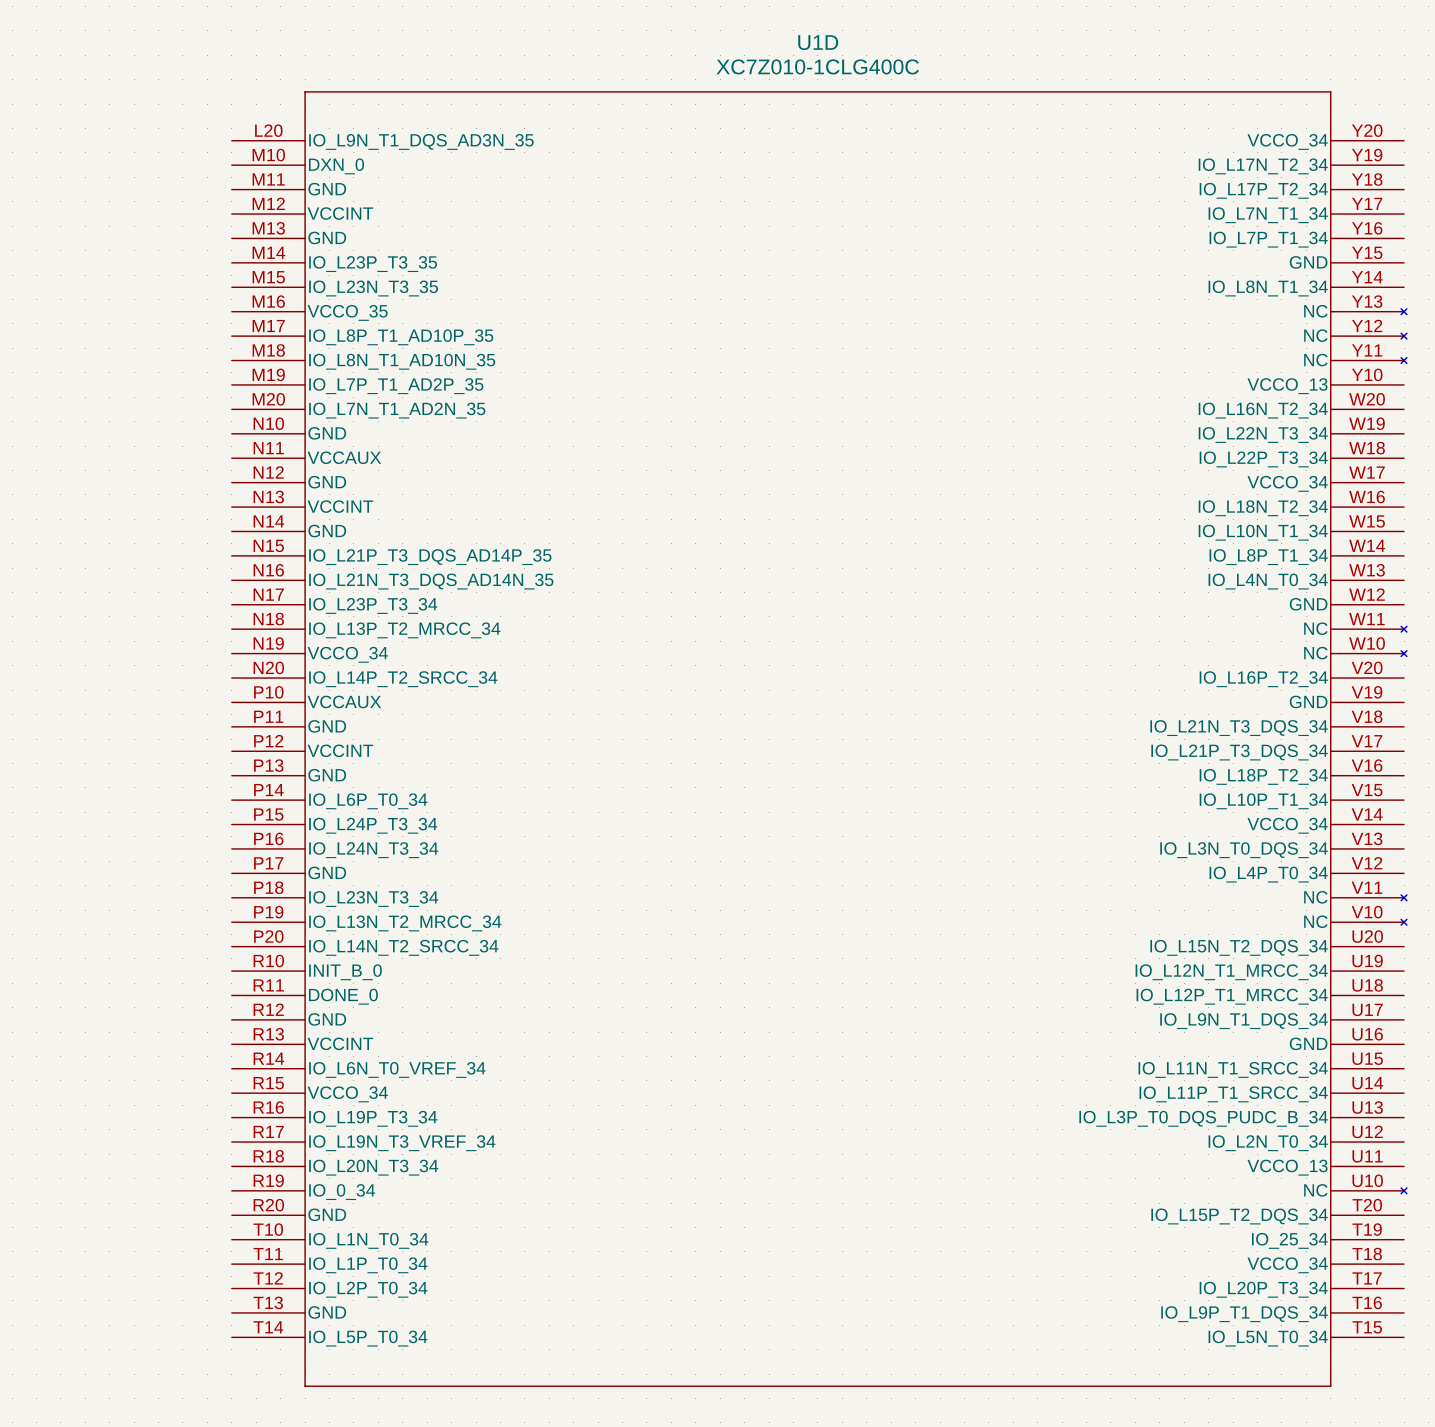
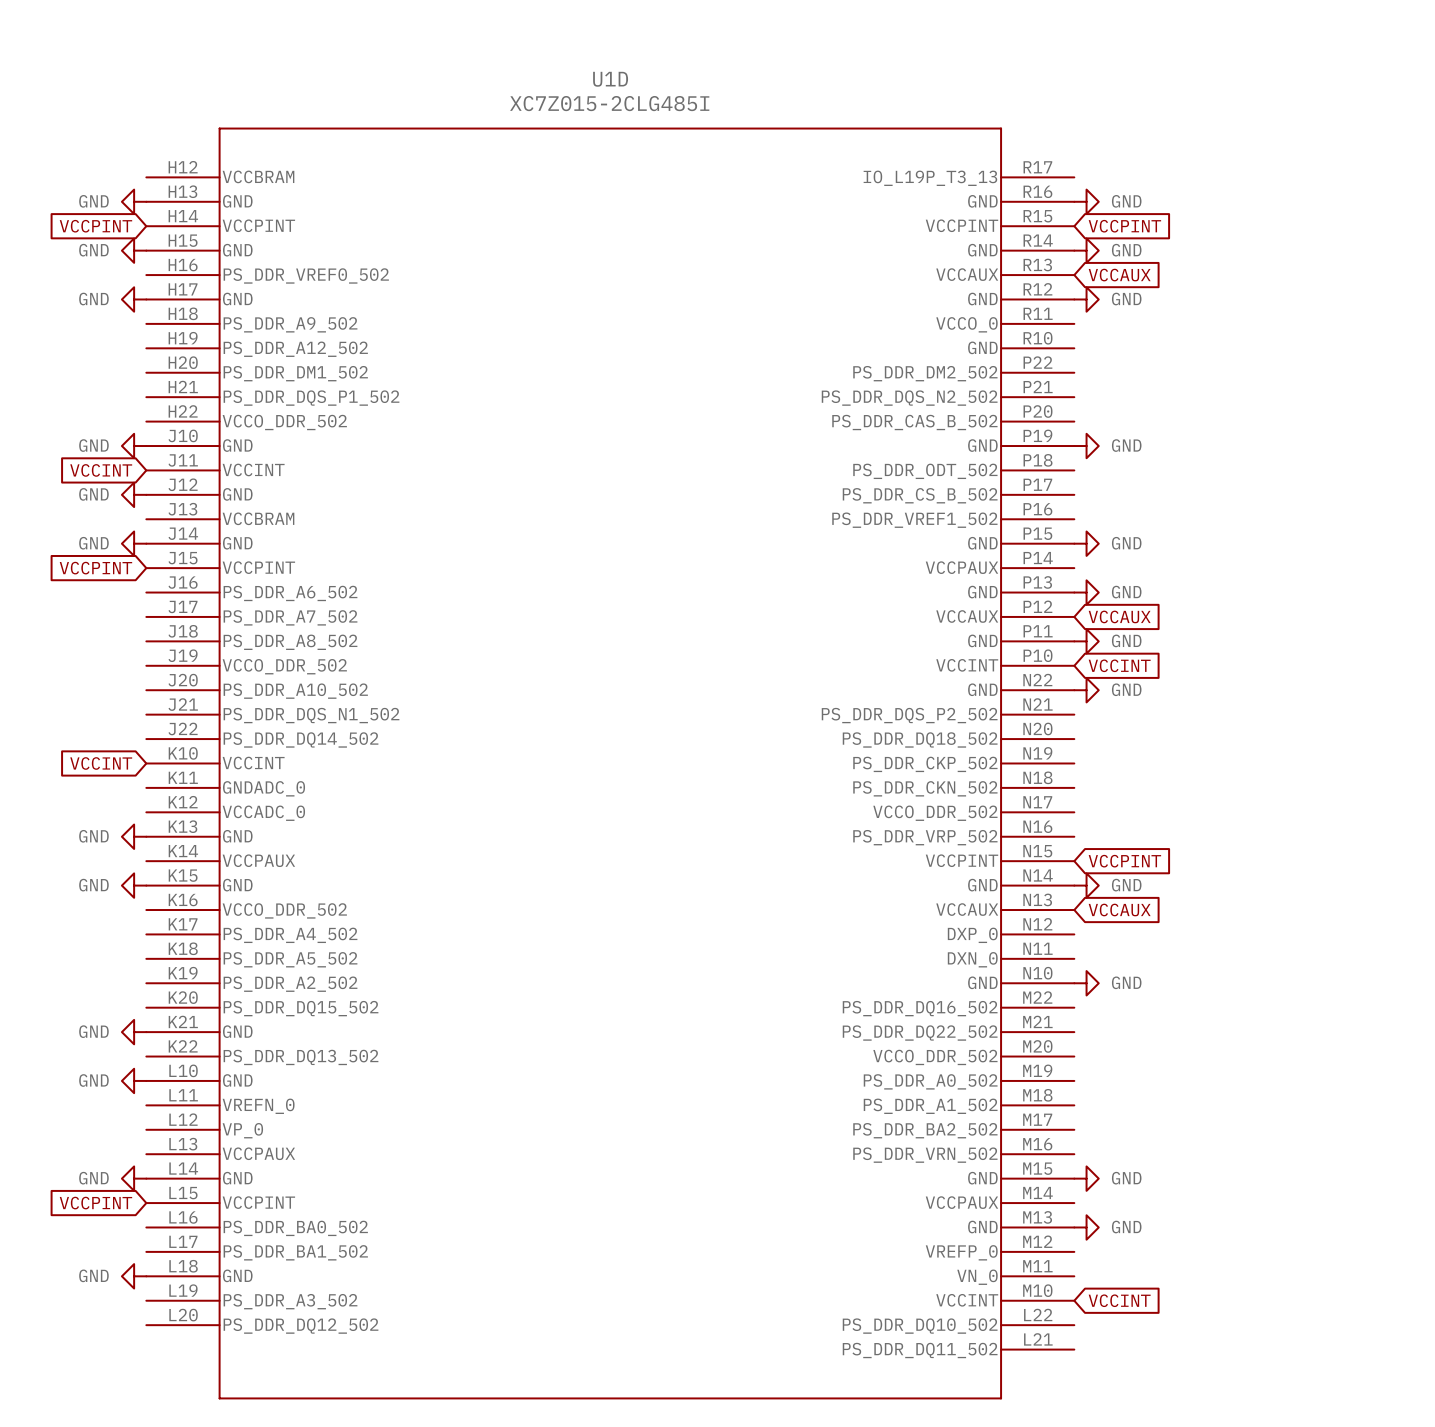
U1D value: XC7Z010-1CLG400C (817, 66) -> XC7Z015-2CLG485I (609, 103)
U1D symbol: [231, 91, 1407, 1387] -> [146, 127, 1075, 1400]
power symbol: none -> GND (134, 201)
power symbol: none -> GND (1086, 201)
global label: none -> VCCPINT (95, 226)
global label: none -> VCCPINT (1124, 226)
power symbol: none -> GND (134, 250)
power symbol: none -> GND (1086, 250)
global label: none -> VCCAUX (1119, 275)
power symbol: none -> GND (134, 299)
power symbol: none -> GND (1086, 299)
power symbol: none -> GND (134, 446)
power symbol: none -> GND (1086, 446)
global label: none -> VCCINT (101, 470)
power symbol: none -> GND (134, 494)
power symbol: none -> GND (134, 543)
power symbol: none -> GND (1086, 543)
global label: none -> VCCPINT (95, 568)
power symbol: none -> GND (1086, 592)
global label: none -> VCCAUX (1119, 616)
power symbol: none -> GND (1086, 641)
global label: none -> VCCINT (1119, 665)
power symbol: none -> GND (1086, 690)
global label: none -> VCCINT (101, 763)
power symbol: none -> GND (134, 836)
global label: none -> VCCPINT (1124, 861)
power symbol: none -> GND (134, 885)
power symbol: none -> GND (1086, 885)
global label: none -> VCCAUX (1119, 910)
power symbol: none -> GND (1086, 983)
power symbol: none -> GND (134, 1032)
power symbol: none -> GND (134, 1080)
power symbol: none -> GND (134, 1178)
power symbol: none -> GND (1086, 1178)
global label: none -> VCCPINT (95, 1203)
power symbol: none -> GND (1086, 1227)
power symbol: none -> GND (134, 1276)
global label: none -> VCCINT (1119, 1300)

